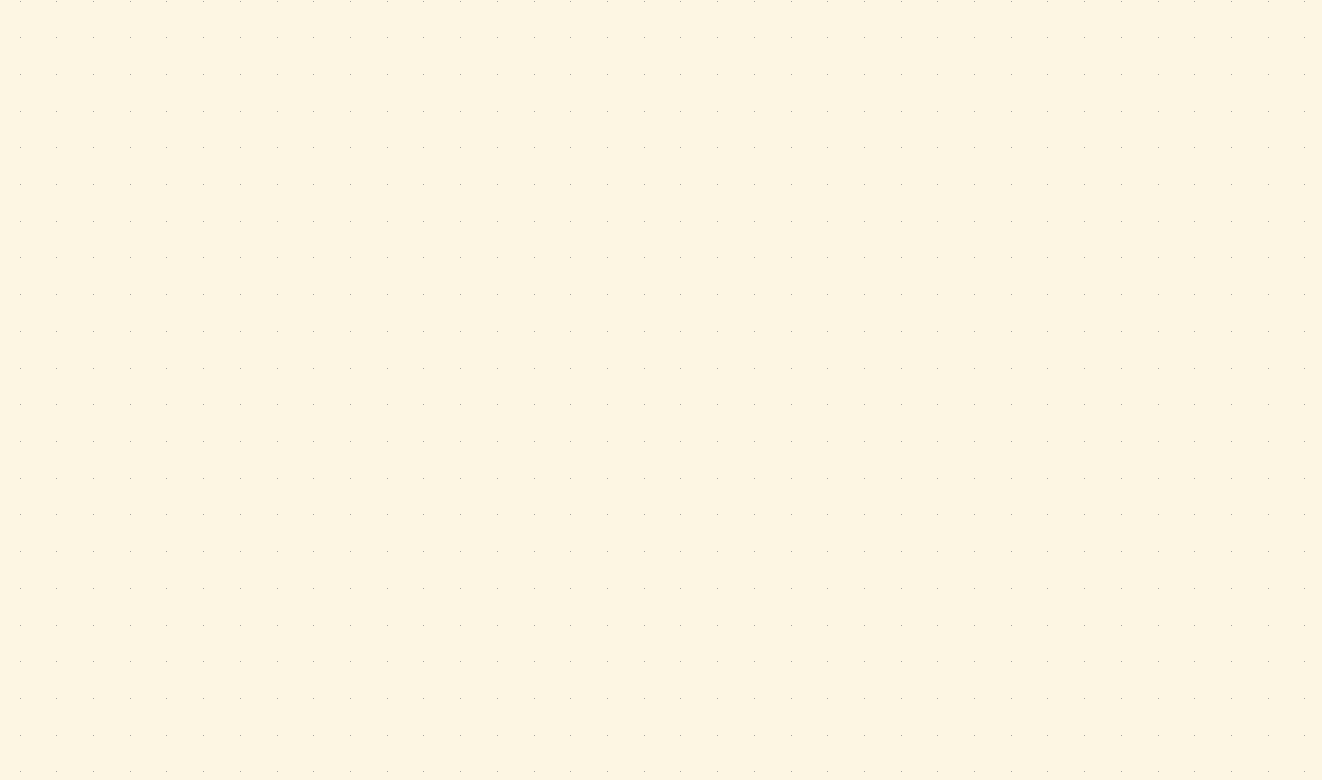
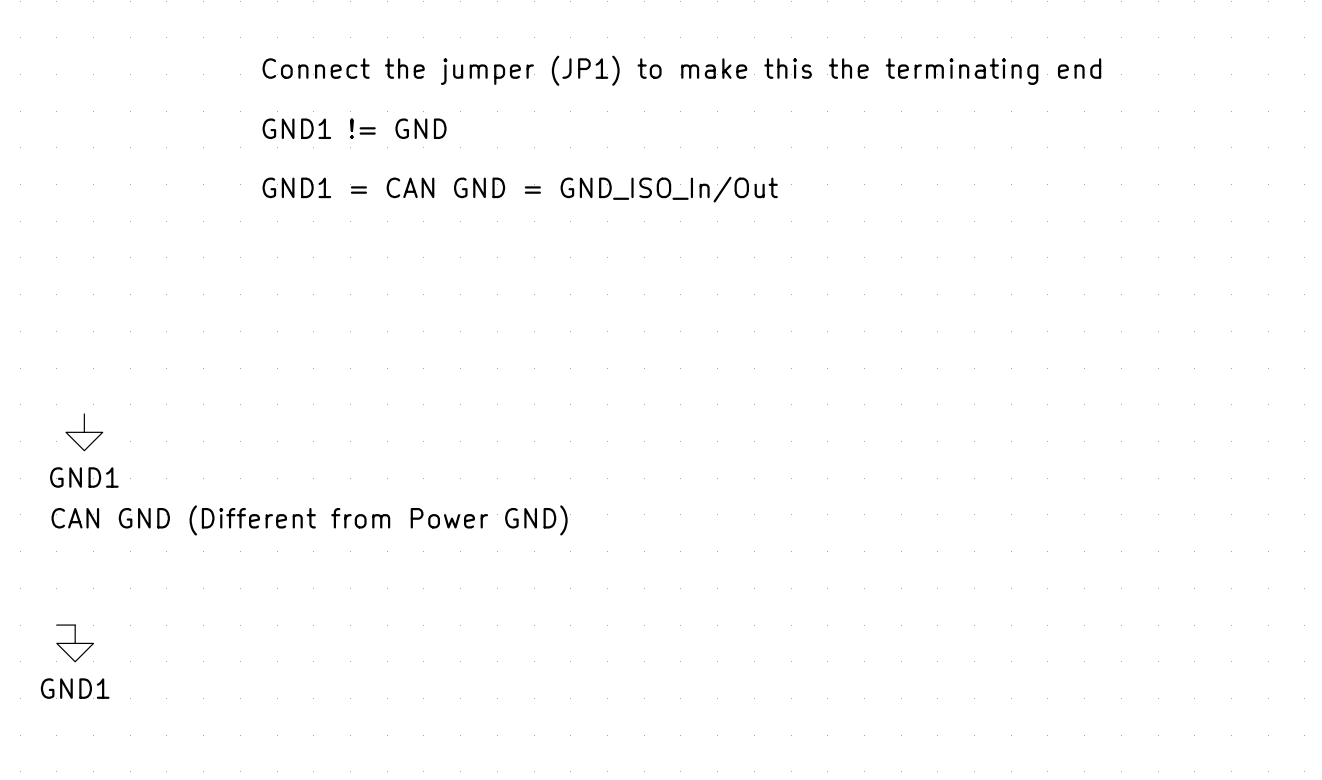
text: none -> Connect the jumper (JP1) to make this the terminating end (681, 70)
text: none -> GND1 != GND (354, 128)
text: none -> GND1 = CAN GND = GND_ISO_In/Out (520, 189)
power symbol: none -> GND1 (84, 432)
text: none -> CAN GND (Different from Power GND) (309, 520)
wire: none -> (56, 625) (75, 625)
power symbol: none -> GND1 (75, 643)

